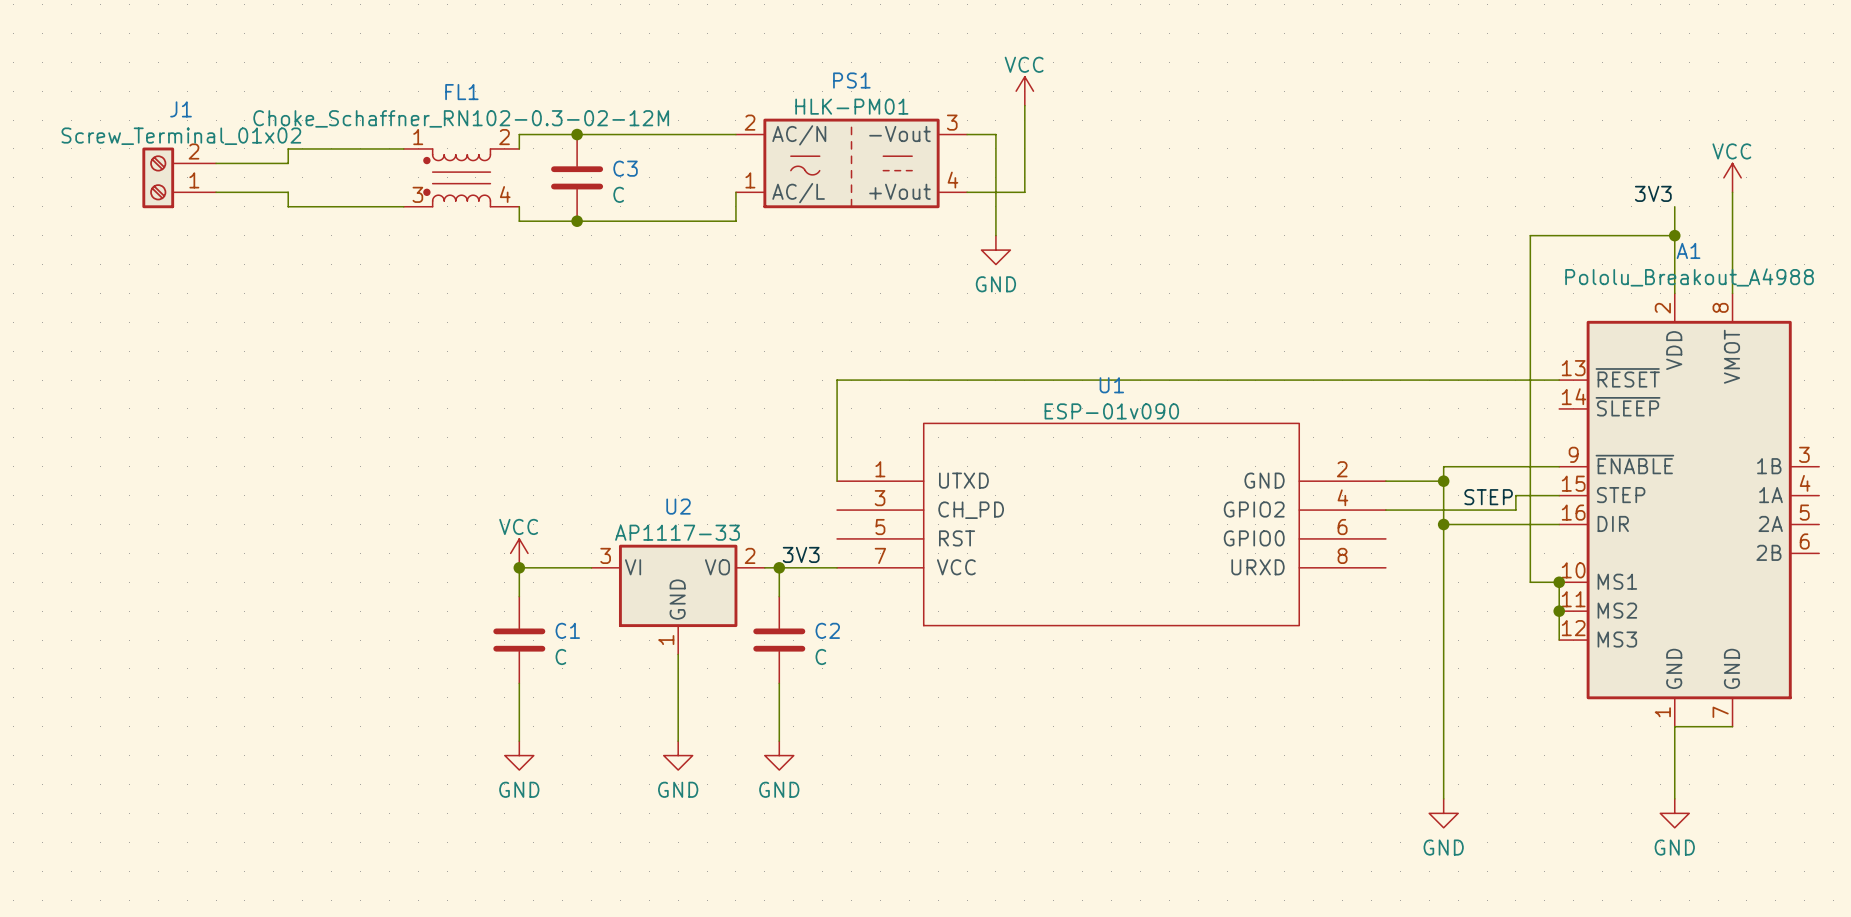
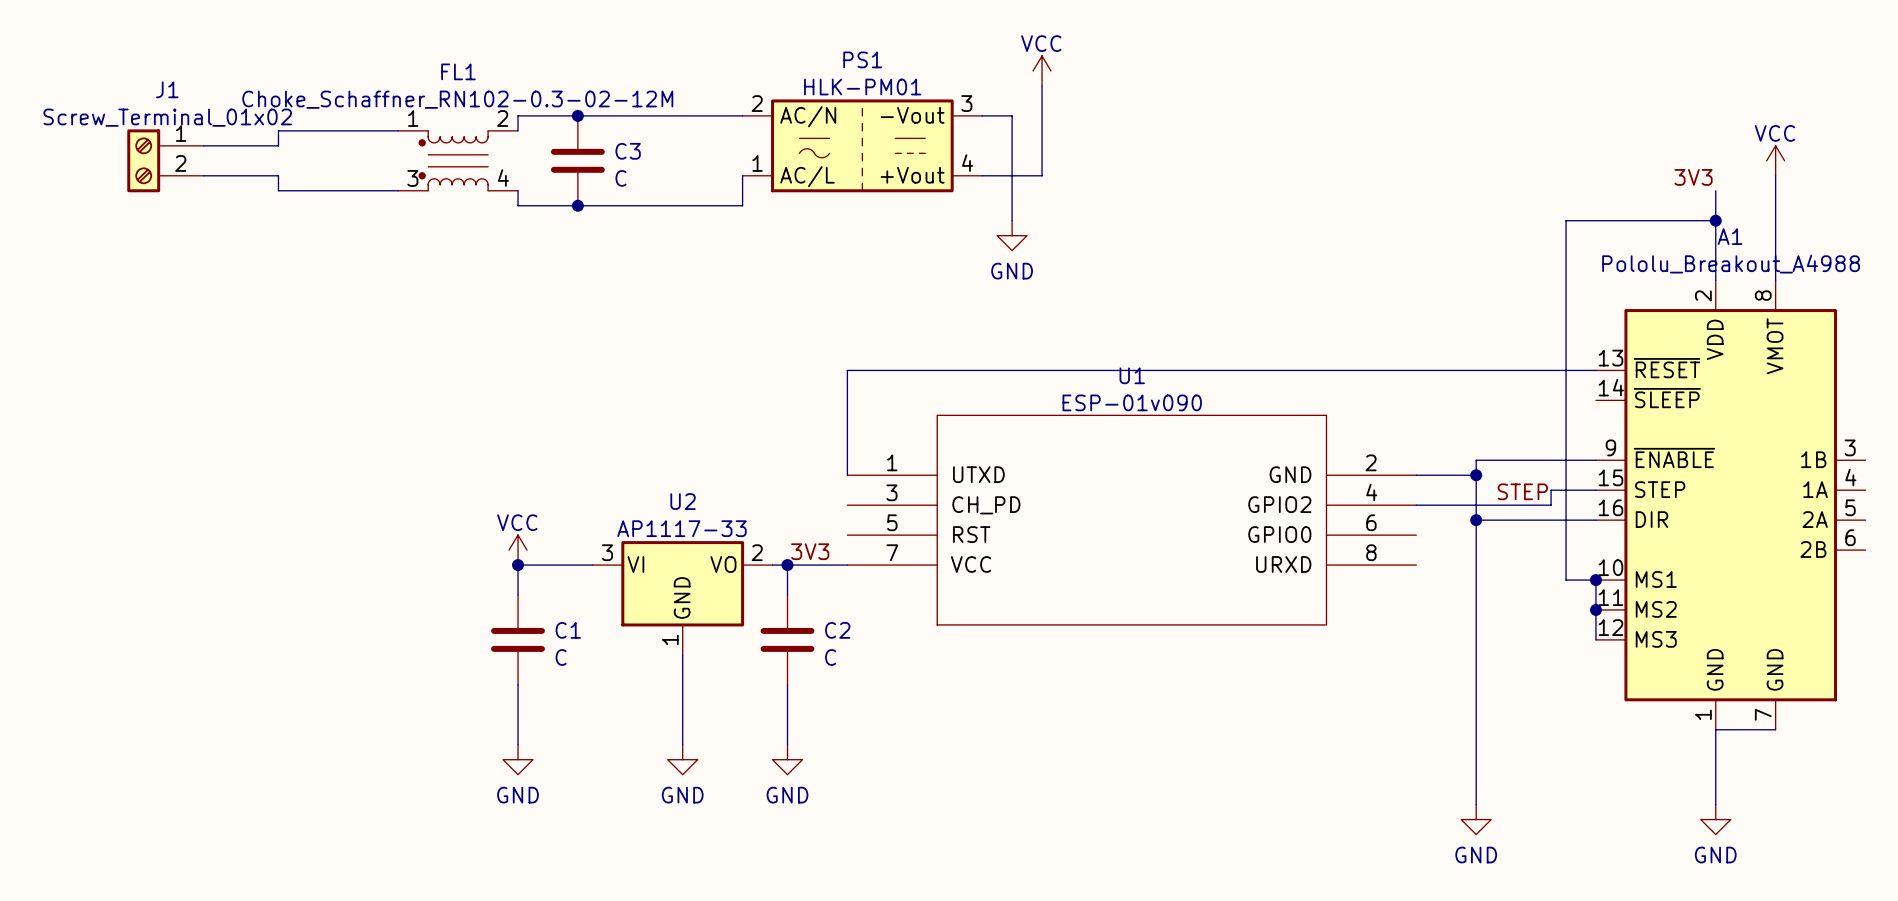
J1 flip: as is (158, 177) -> up-down (143, 160)

